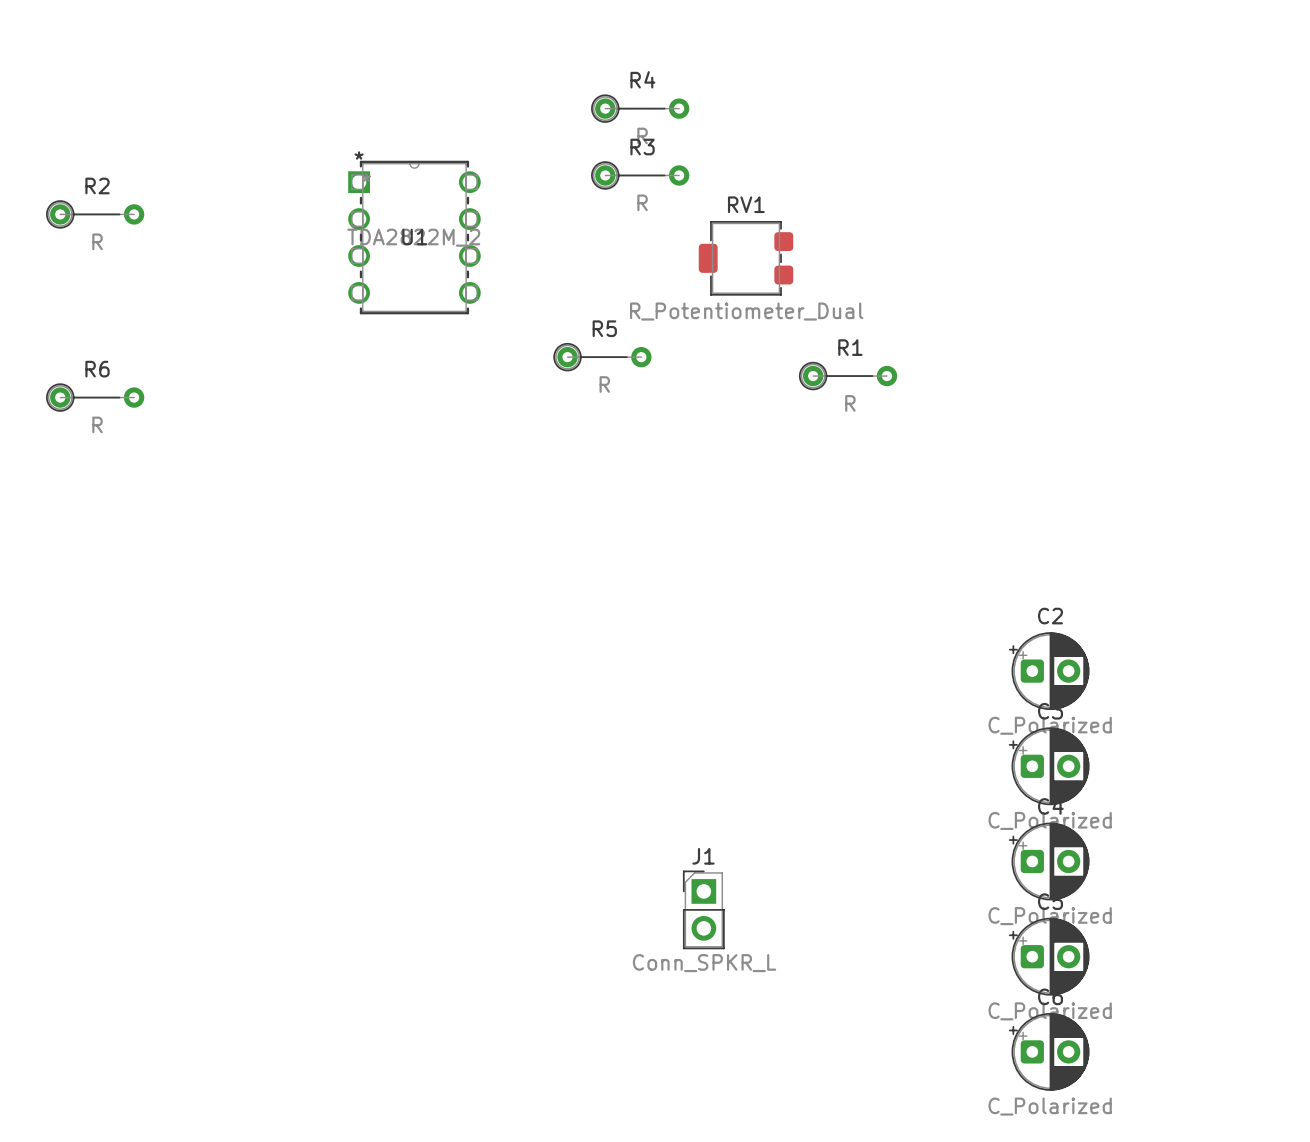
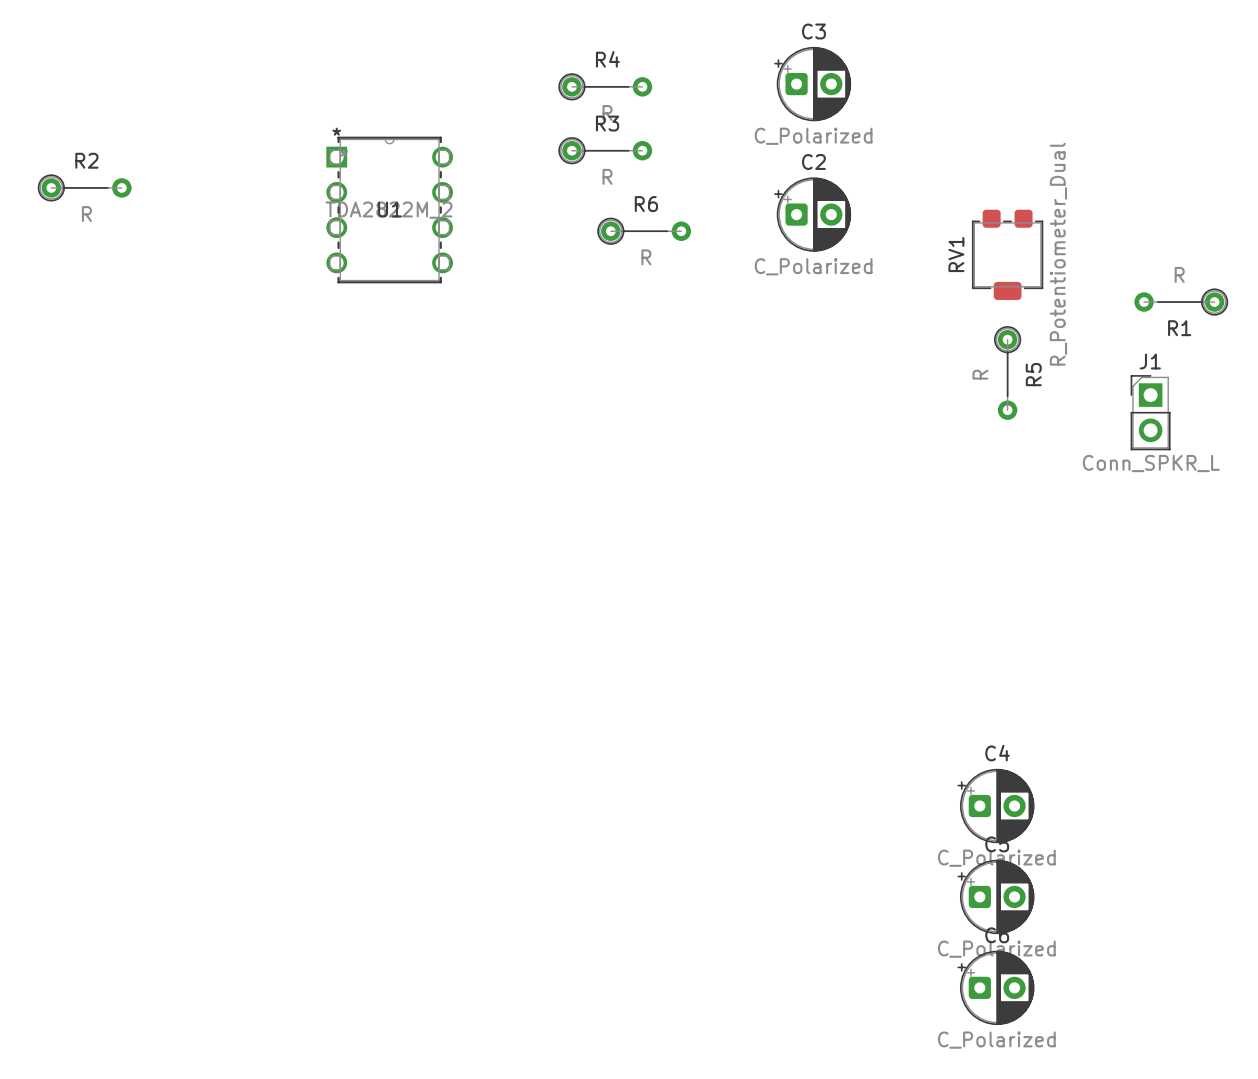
RV1 rotation: 0° (745, 258) -> 90° counterclockwise (1007, 254)
RV1 position: (745, 258) -> (1007, 254)
R5 rotation: 0° (602, 357) -> 90° clockwise (1007, 372)
R5 position: (602, 357) -> (1007, 372)
R1 rotation: 0° (848, 376) -> 180° (1181, 302)
R1 position: (848, 376) -> (1181, 302)
R6 position: (95, 397) -> (644, 231)
C2 position: (1049, 671) -> (812, 214)
C3 position: (1049, 766) -> (812, 84)
J1 position: (703, 909) -> (1150, 412)

